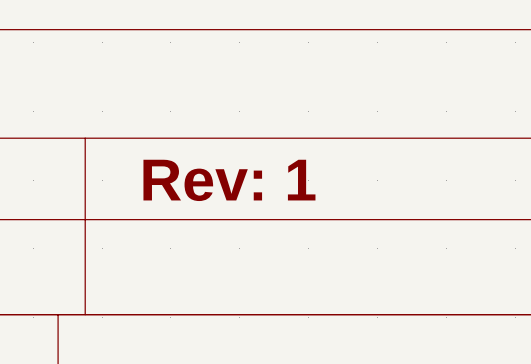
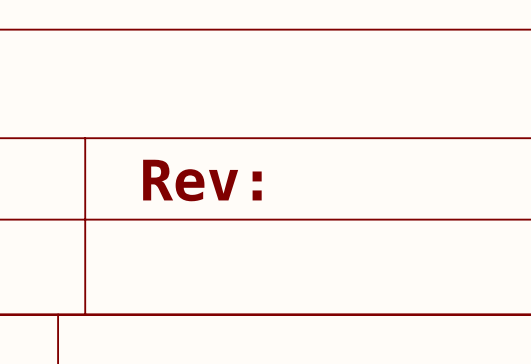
title block: Rev: 1 (229, 180) -> Rev: (202, 180)

